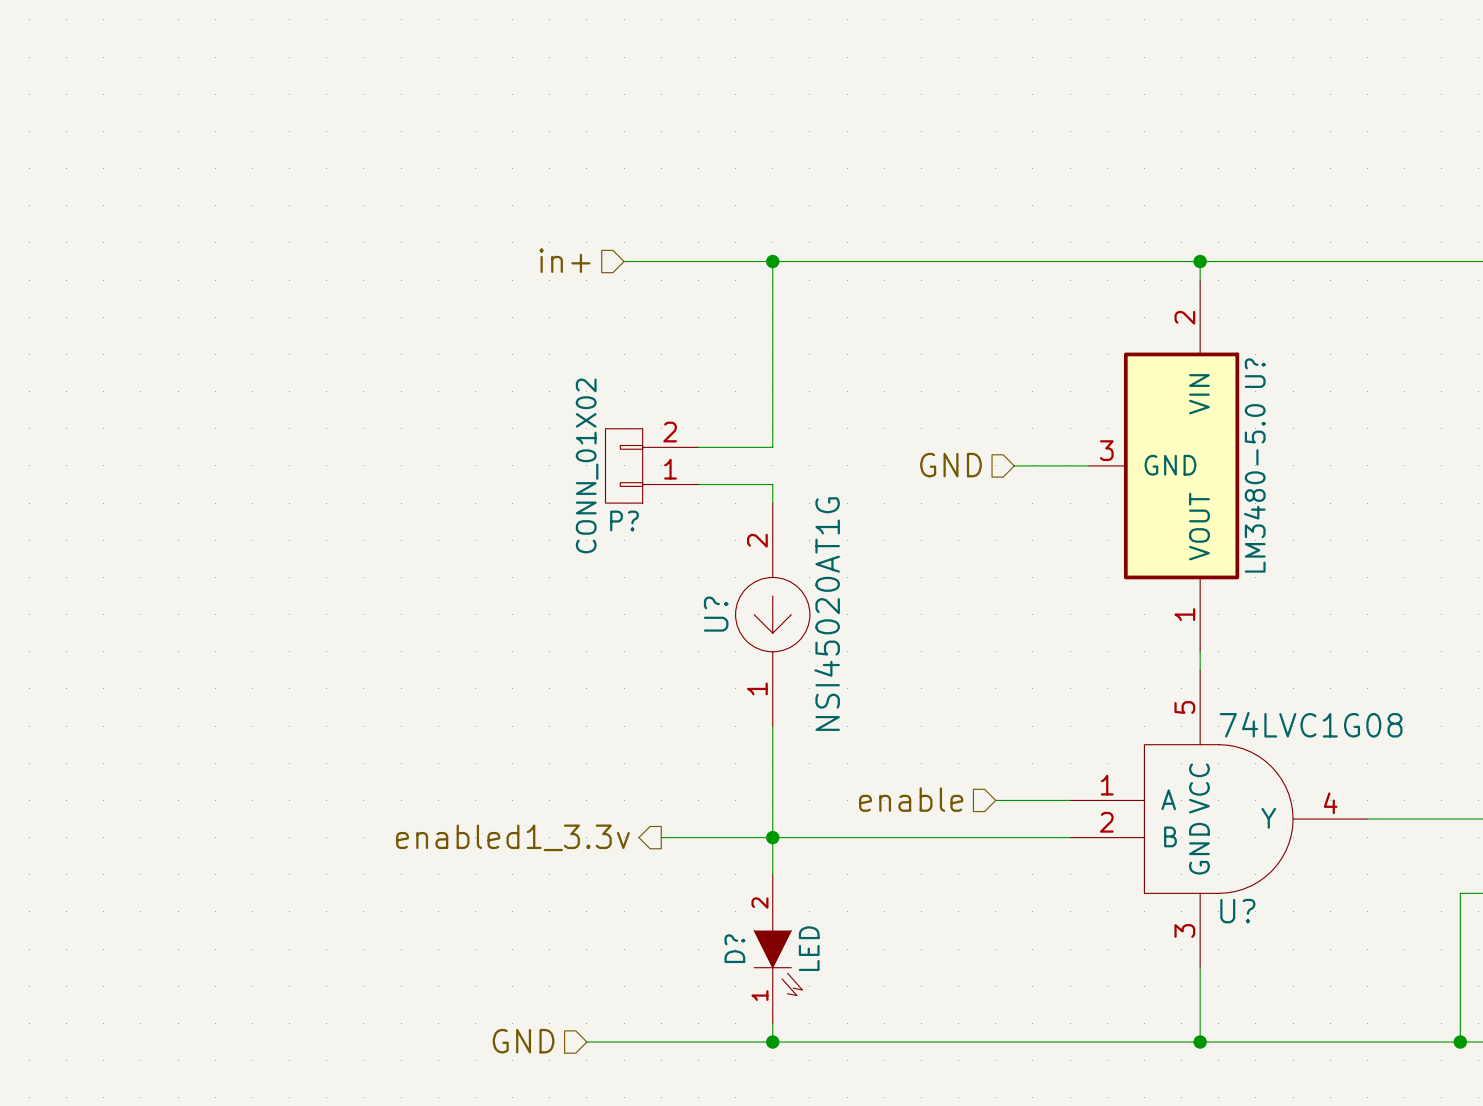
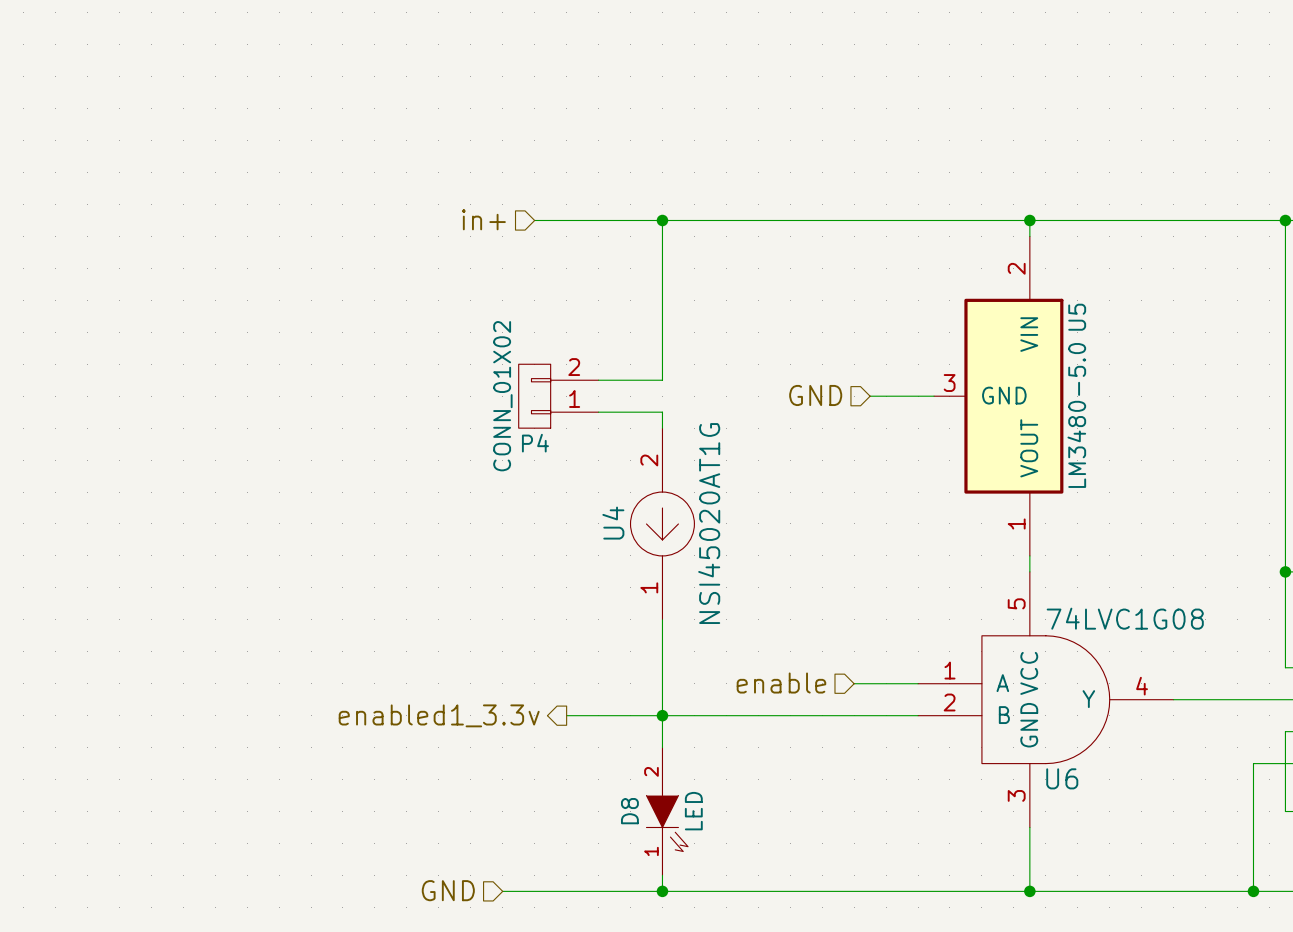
U? name: U? (1255, 373) -> U5 (1077, 317)
P? name: P? (624, 521) -> P4 (535, 443)
U? name: U? (716, 614) -> U4 (613, 523)
U? name: U? (1237, 911) -> U6 (1062, 778)
D? name: D? (734, 948) -> D8 (629, 811)

